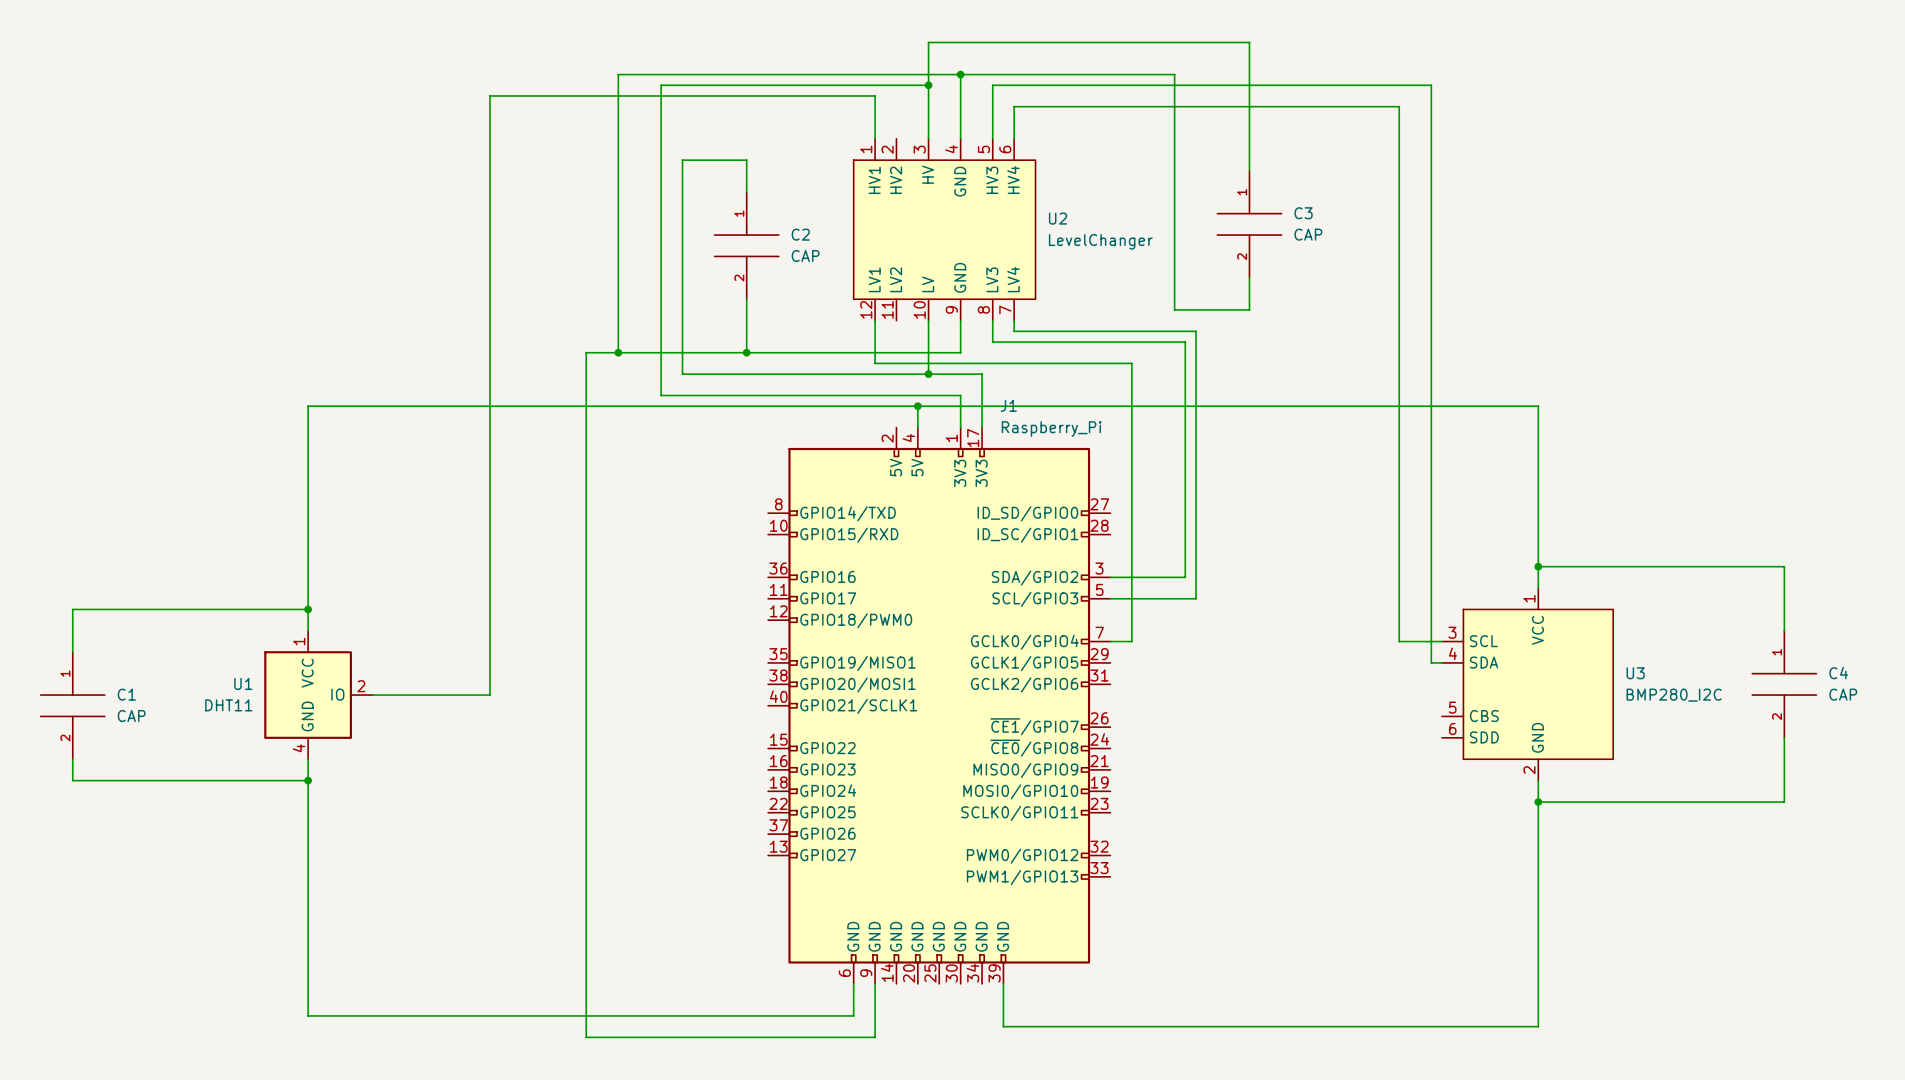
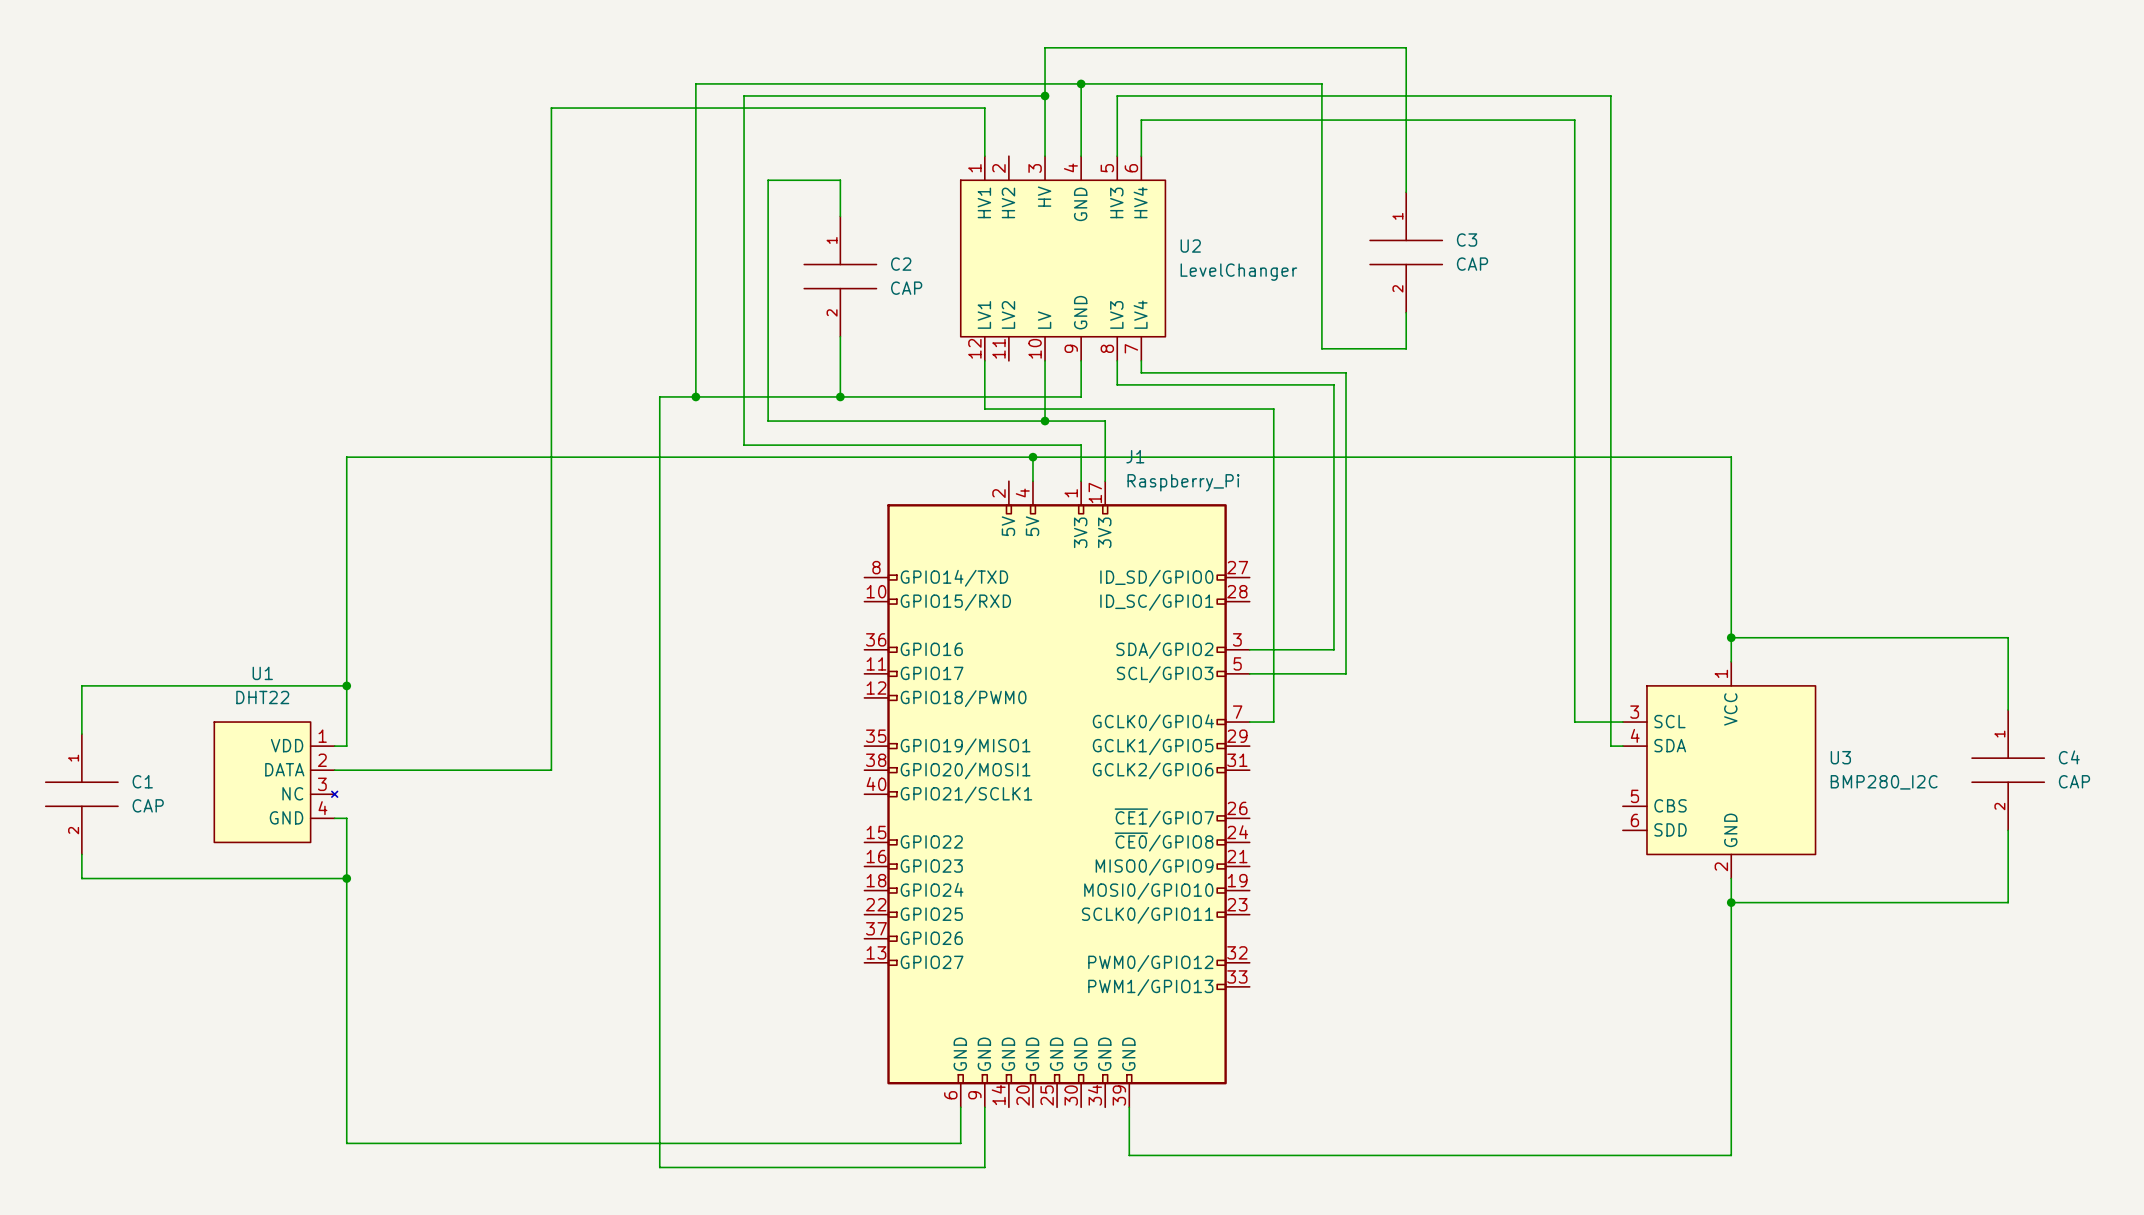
U1 symbol: [264, 630, 373, 760] -> [214, 722, 338, 843]
U1 name position: U1 (243, 683) -> U1 (262, 673)
wire: (489, 684) (489, 695) (372, 695) -> (551, 770) (334, 770)
U1 value: DHT11 (228, 705) -> DHT22 (262, 697)

